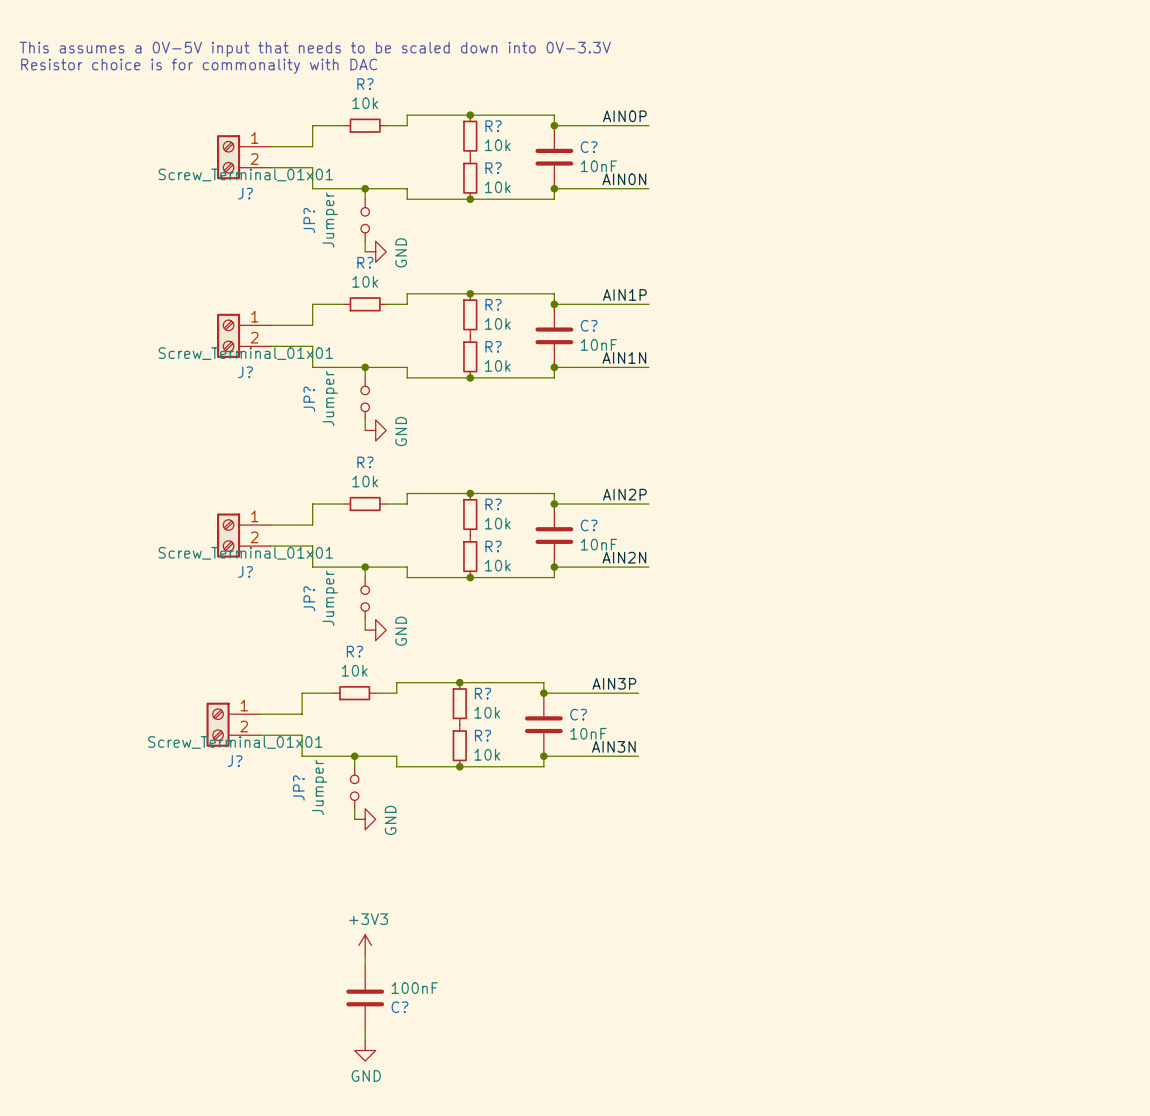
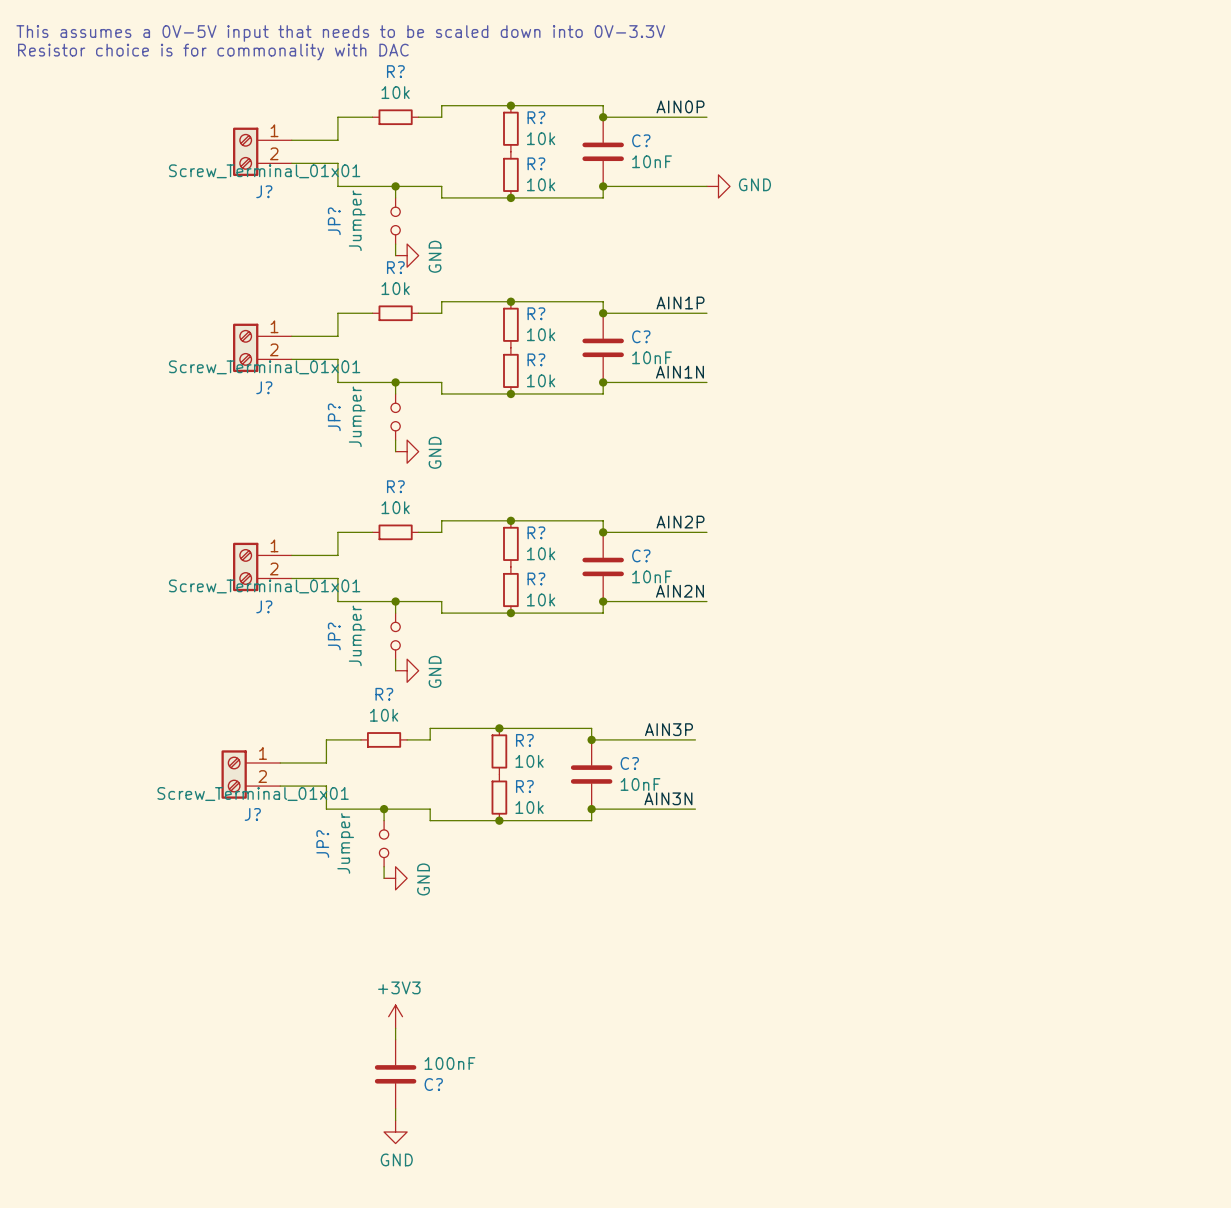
label: AIN0N (624, 179) -> none
power symbol: none -> GND (718, 186)

